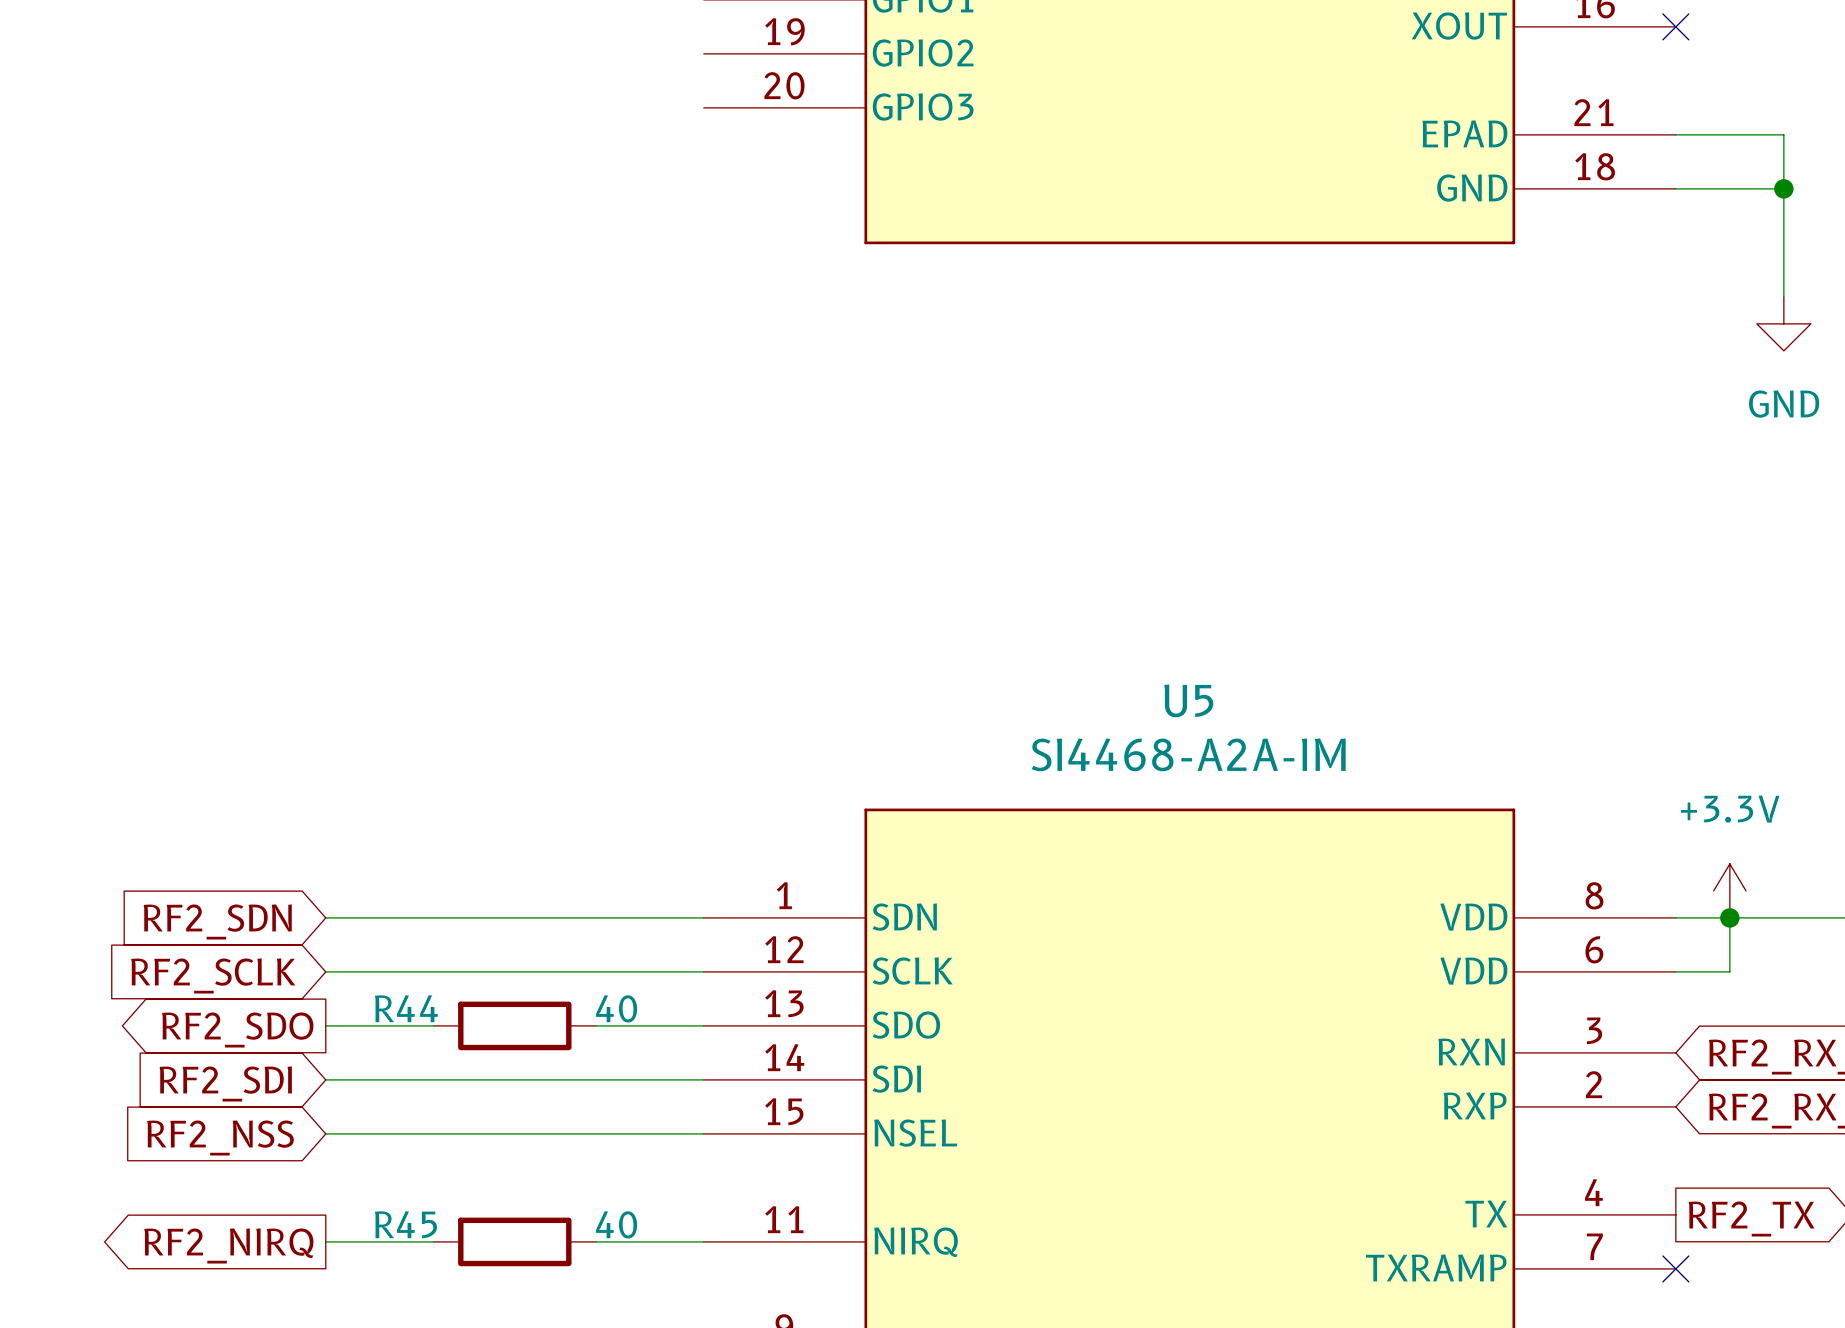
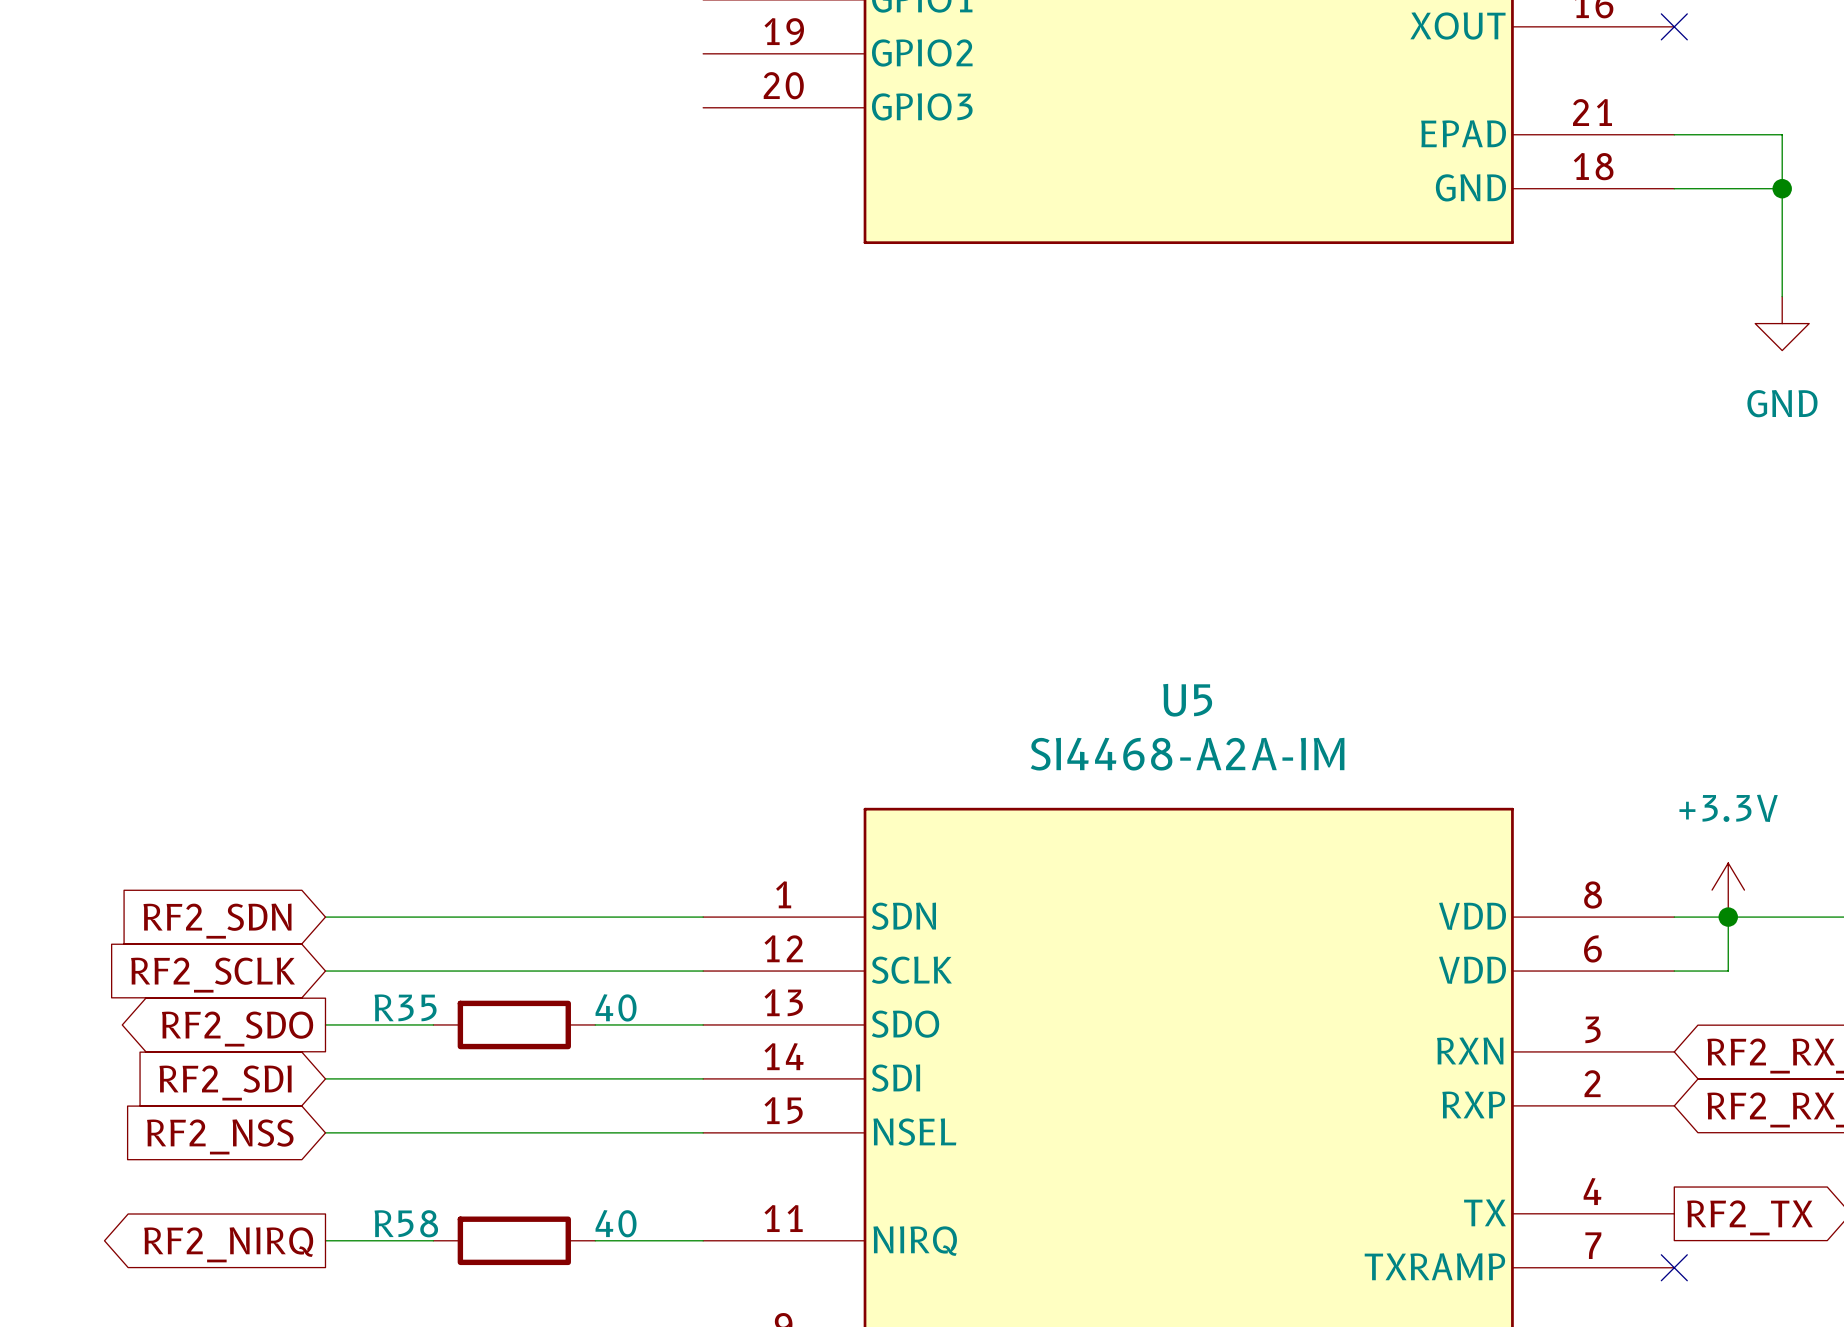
R44 name: R44 (406, 1008) -> R35 (405, 1007)
R45 name: R45 (405, 1224) -> R58 (406, 1223)

